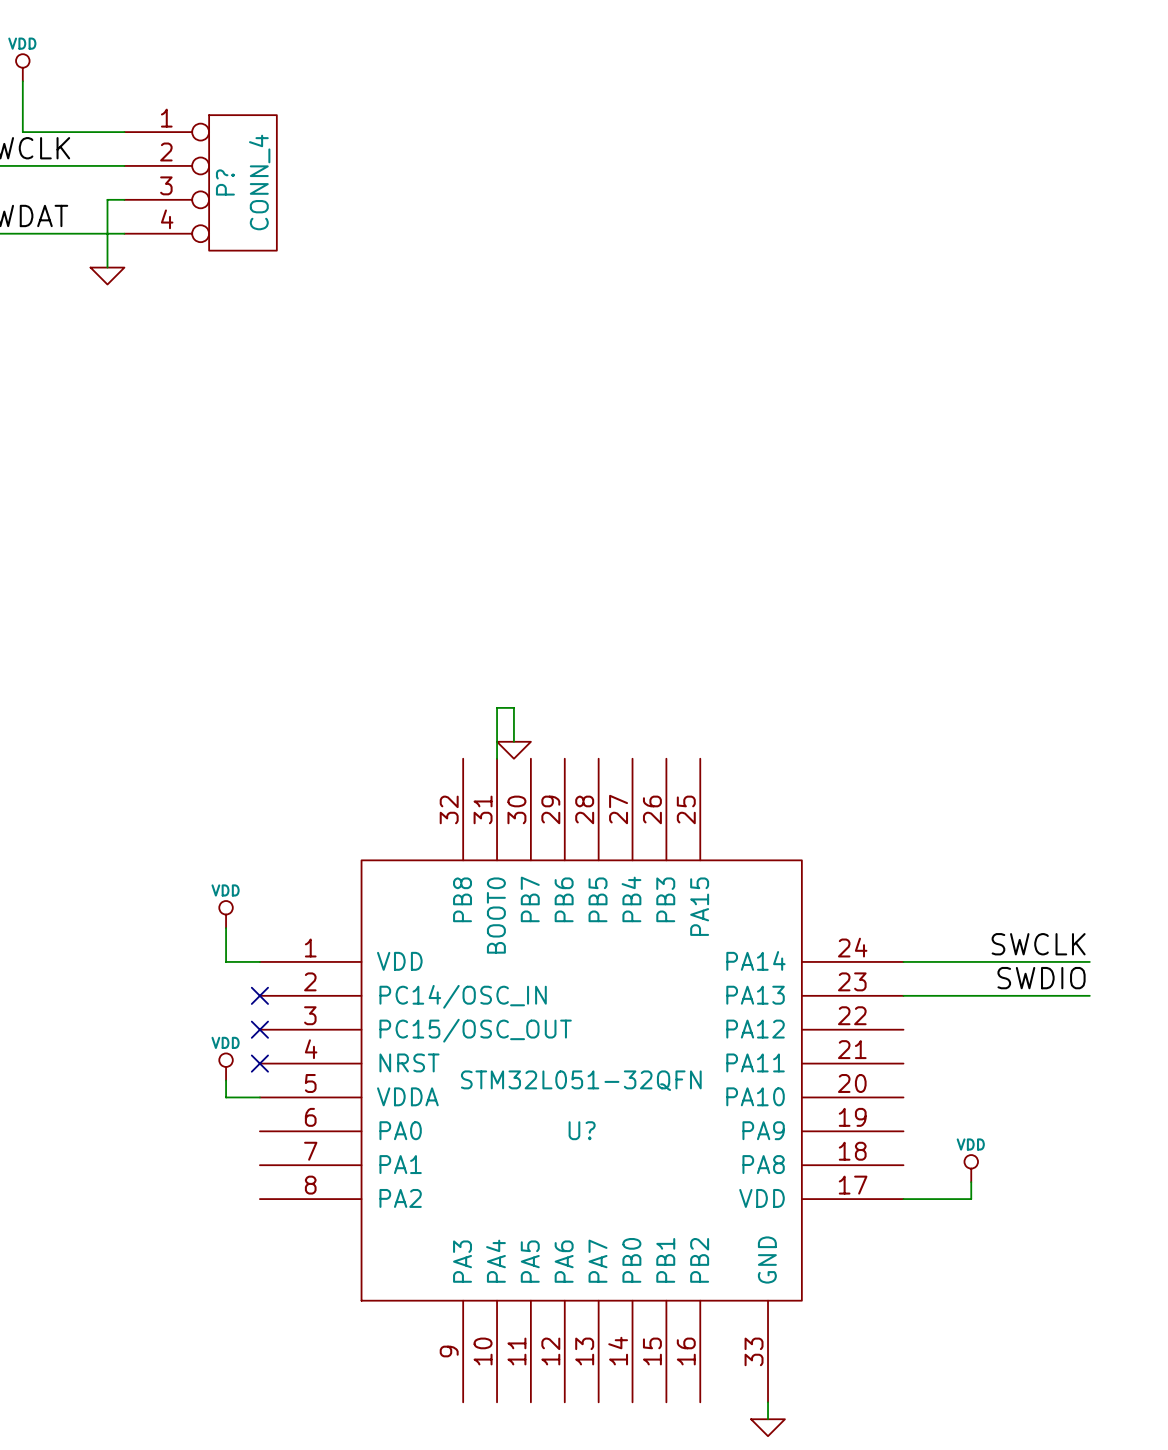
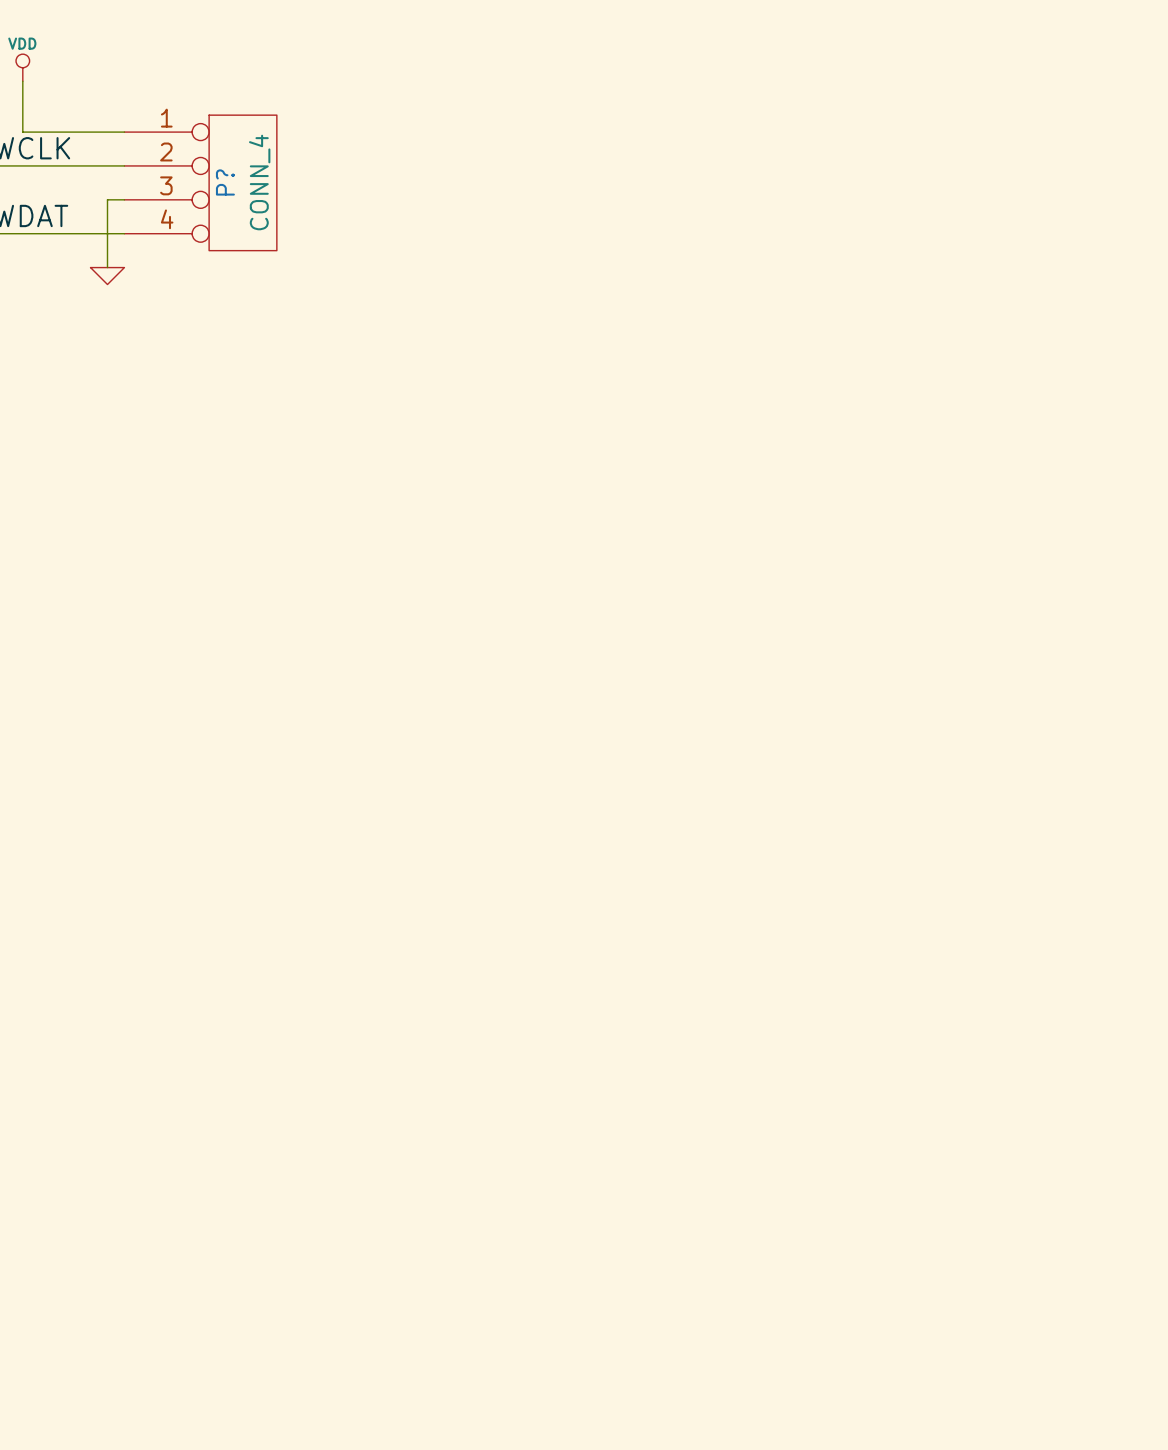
wire: (513, 741) (513, 707) (497, 707) (497, 758) -> none
power symbol: (513, 750) -> none
power symbol: VDD (226, 914) -> none
wire: (226, 928) (226, 961) (259, 961) -> none
label: SWCLK (1038, 944) -> none
wire: (903, 961) (1089, 961) -> none
label: SWDIO (1041, 978) -> none
no-connect mark: (259, 995) -> none
wire: (903, 995) (1089, 995) -> none
no-connect mark: (259, 1029) -> none
no-connect mark: (259, 1063) -> none
power symbol: VDD (226, 1066) -> none
wire: (226, 1080) (226, 1097) (259, 1097) -> none
U?: STM32L051-32QFN (581, 1080) -> none
power symbol: VDD (971, 1168) -> none
wire: (971, 1182) (971, 1199) (903, 1199) -> none
wire: (768, 1402) (768, 1419) -> none
power symbol: (768, 1427) -> none

